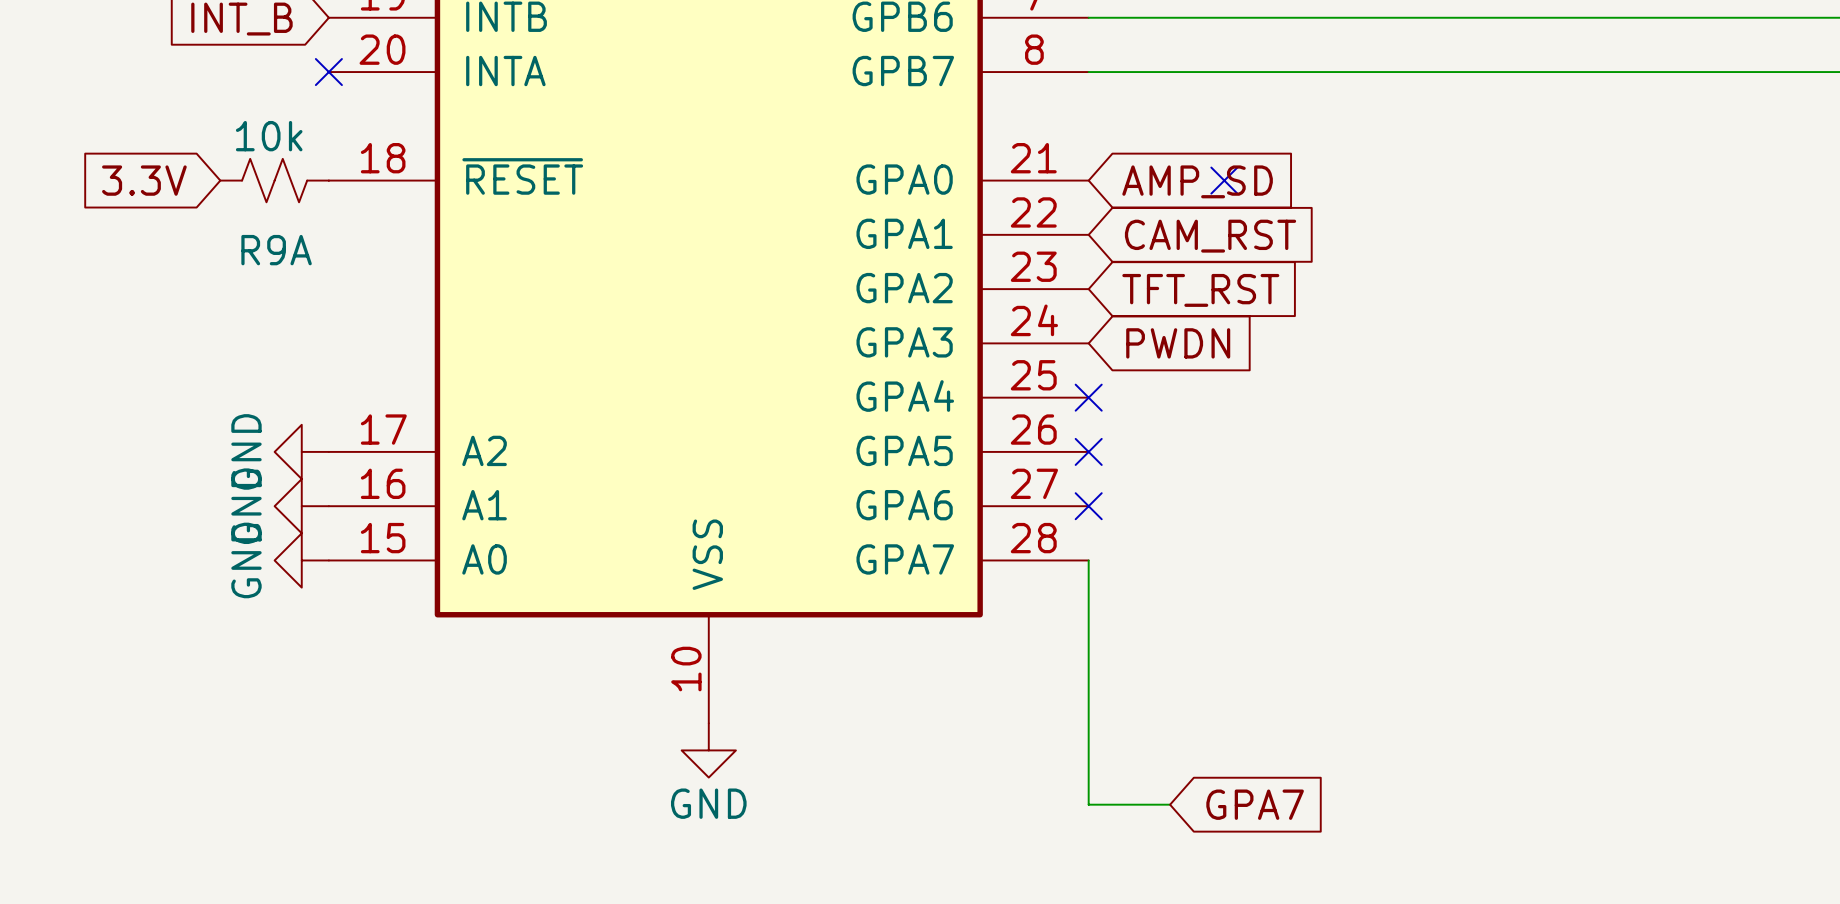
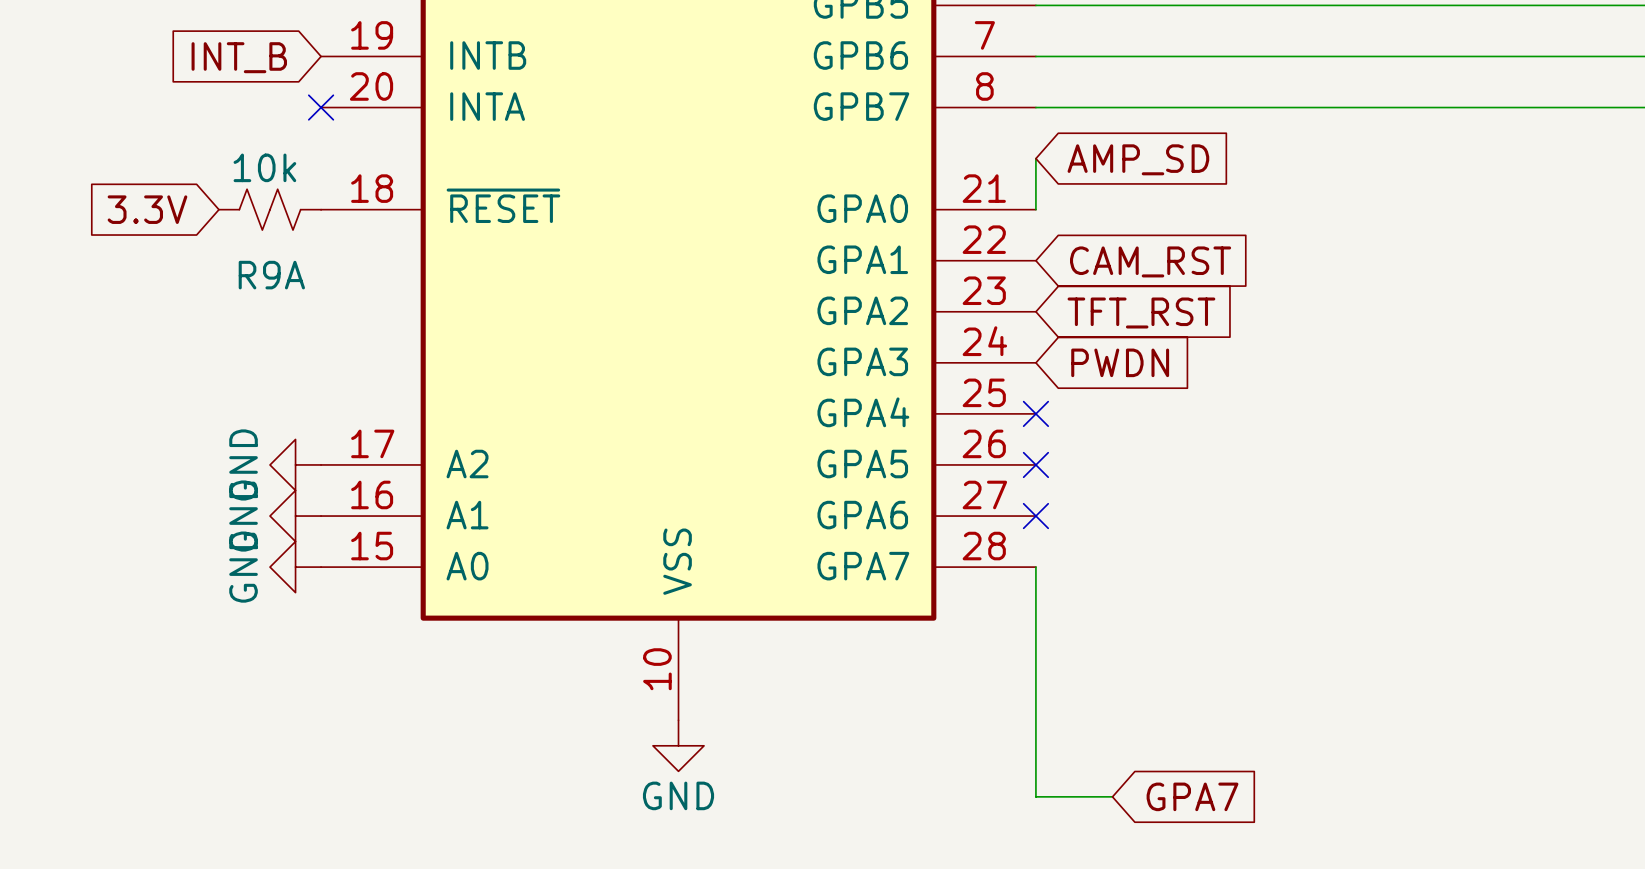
wire: none -> (1035, 158) (1035, 209)
no-connect mark: (1224, 180) -> none
global label position: AMP_SD (1197, 181) -> AMP_SD (1138, 159)

